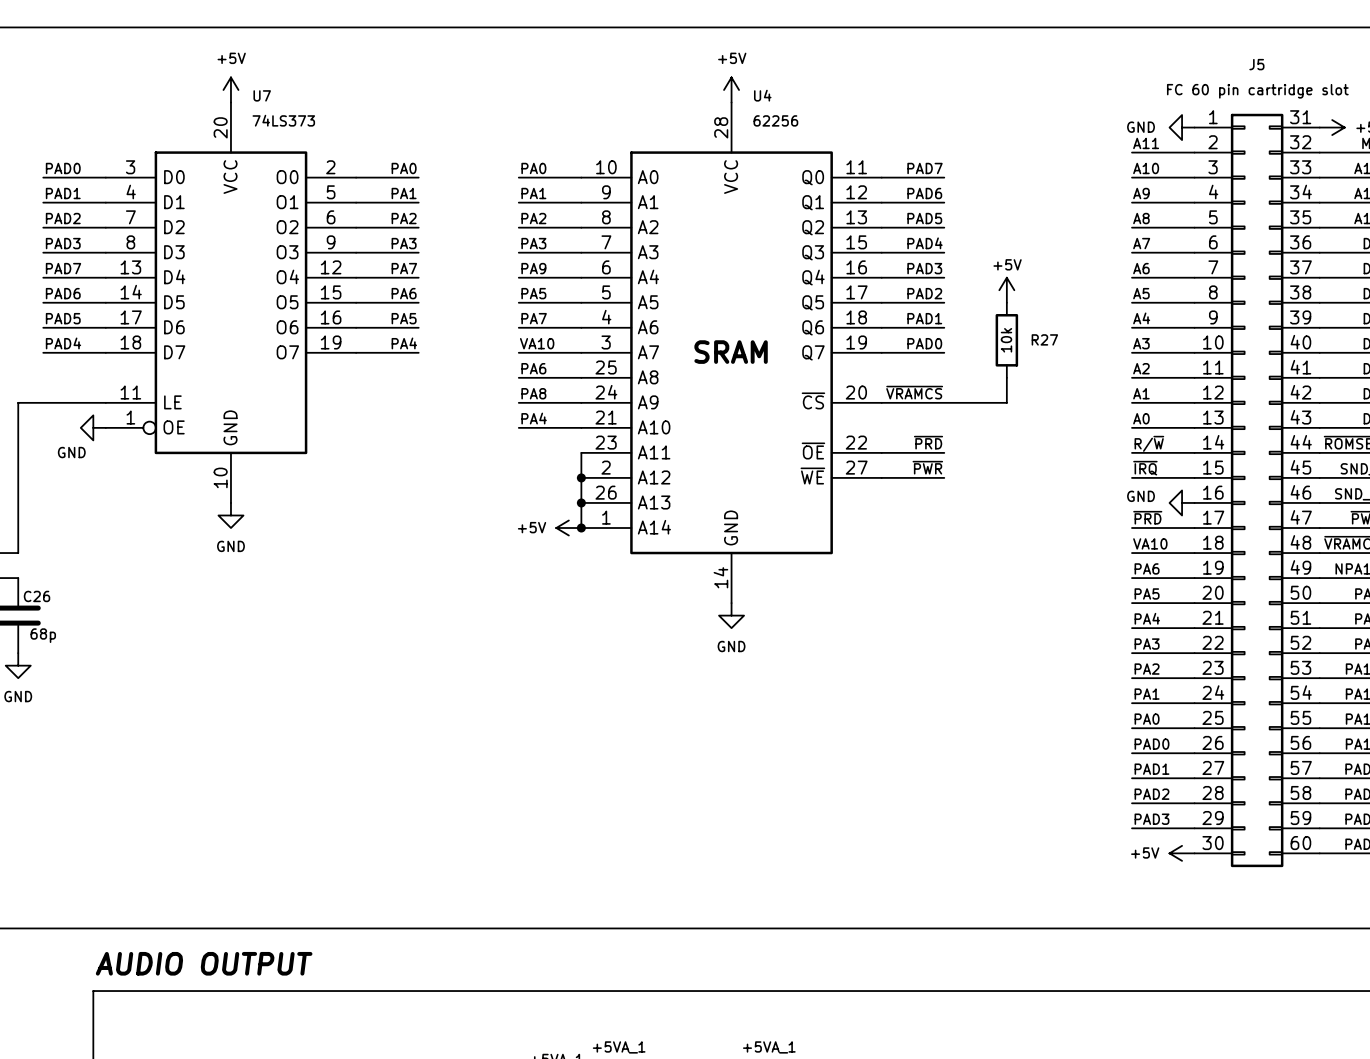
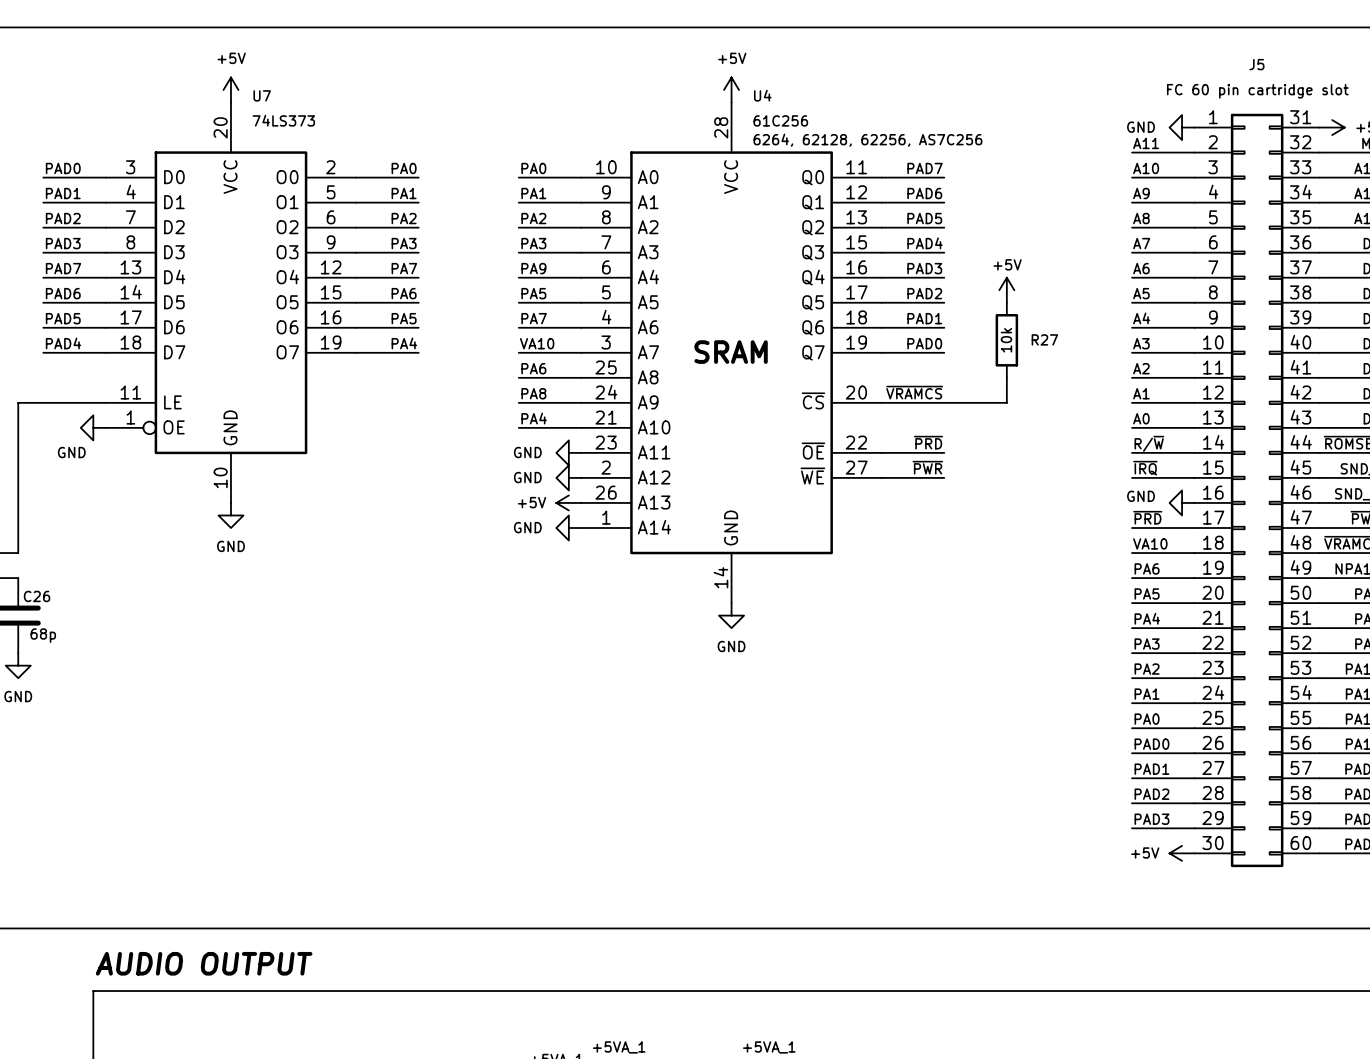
U4 value: 62256 (775, 120) -> 61C256 (780, 120)
U4 text: none -> 6264, 62128, 62256, AS7C256 (867, 140)
power symbol: none -> GND (568, 452)
wire: (581, 452) (581, 528) -> none
power symbol: none -> GND (568, 477)
junction: (581, 477) -> none
power symbol: none -> +5V (568, 502)
junction: (581, 502) -> none
power symbol: +5V (568, 528) -> GND (568, 528)
junction: (581, 528) -> none

